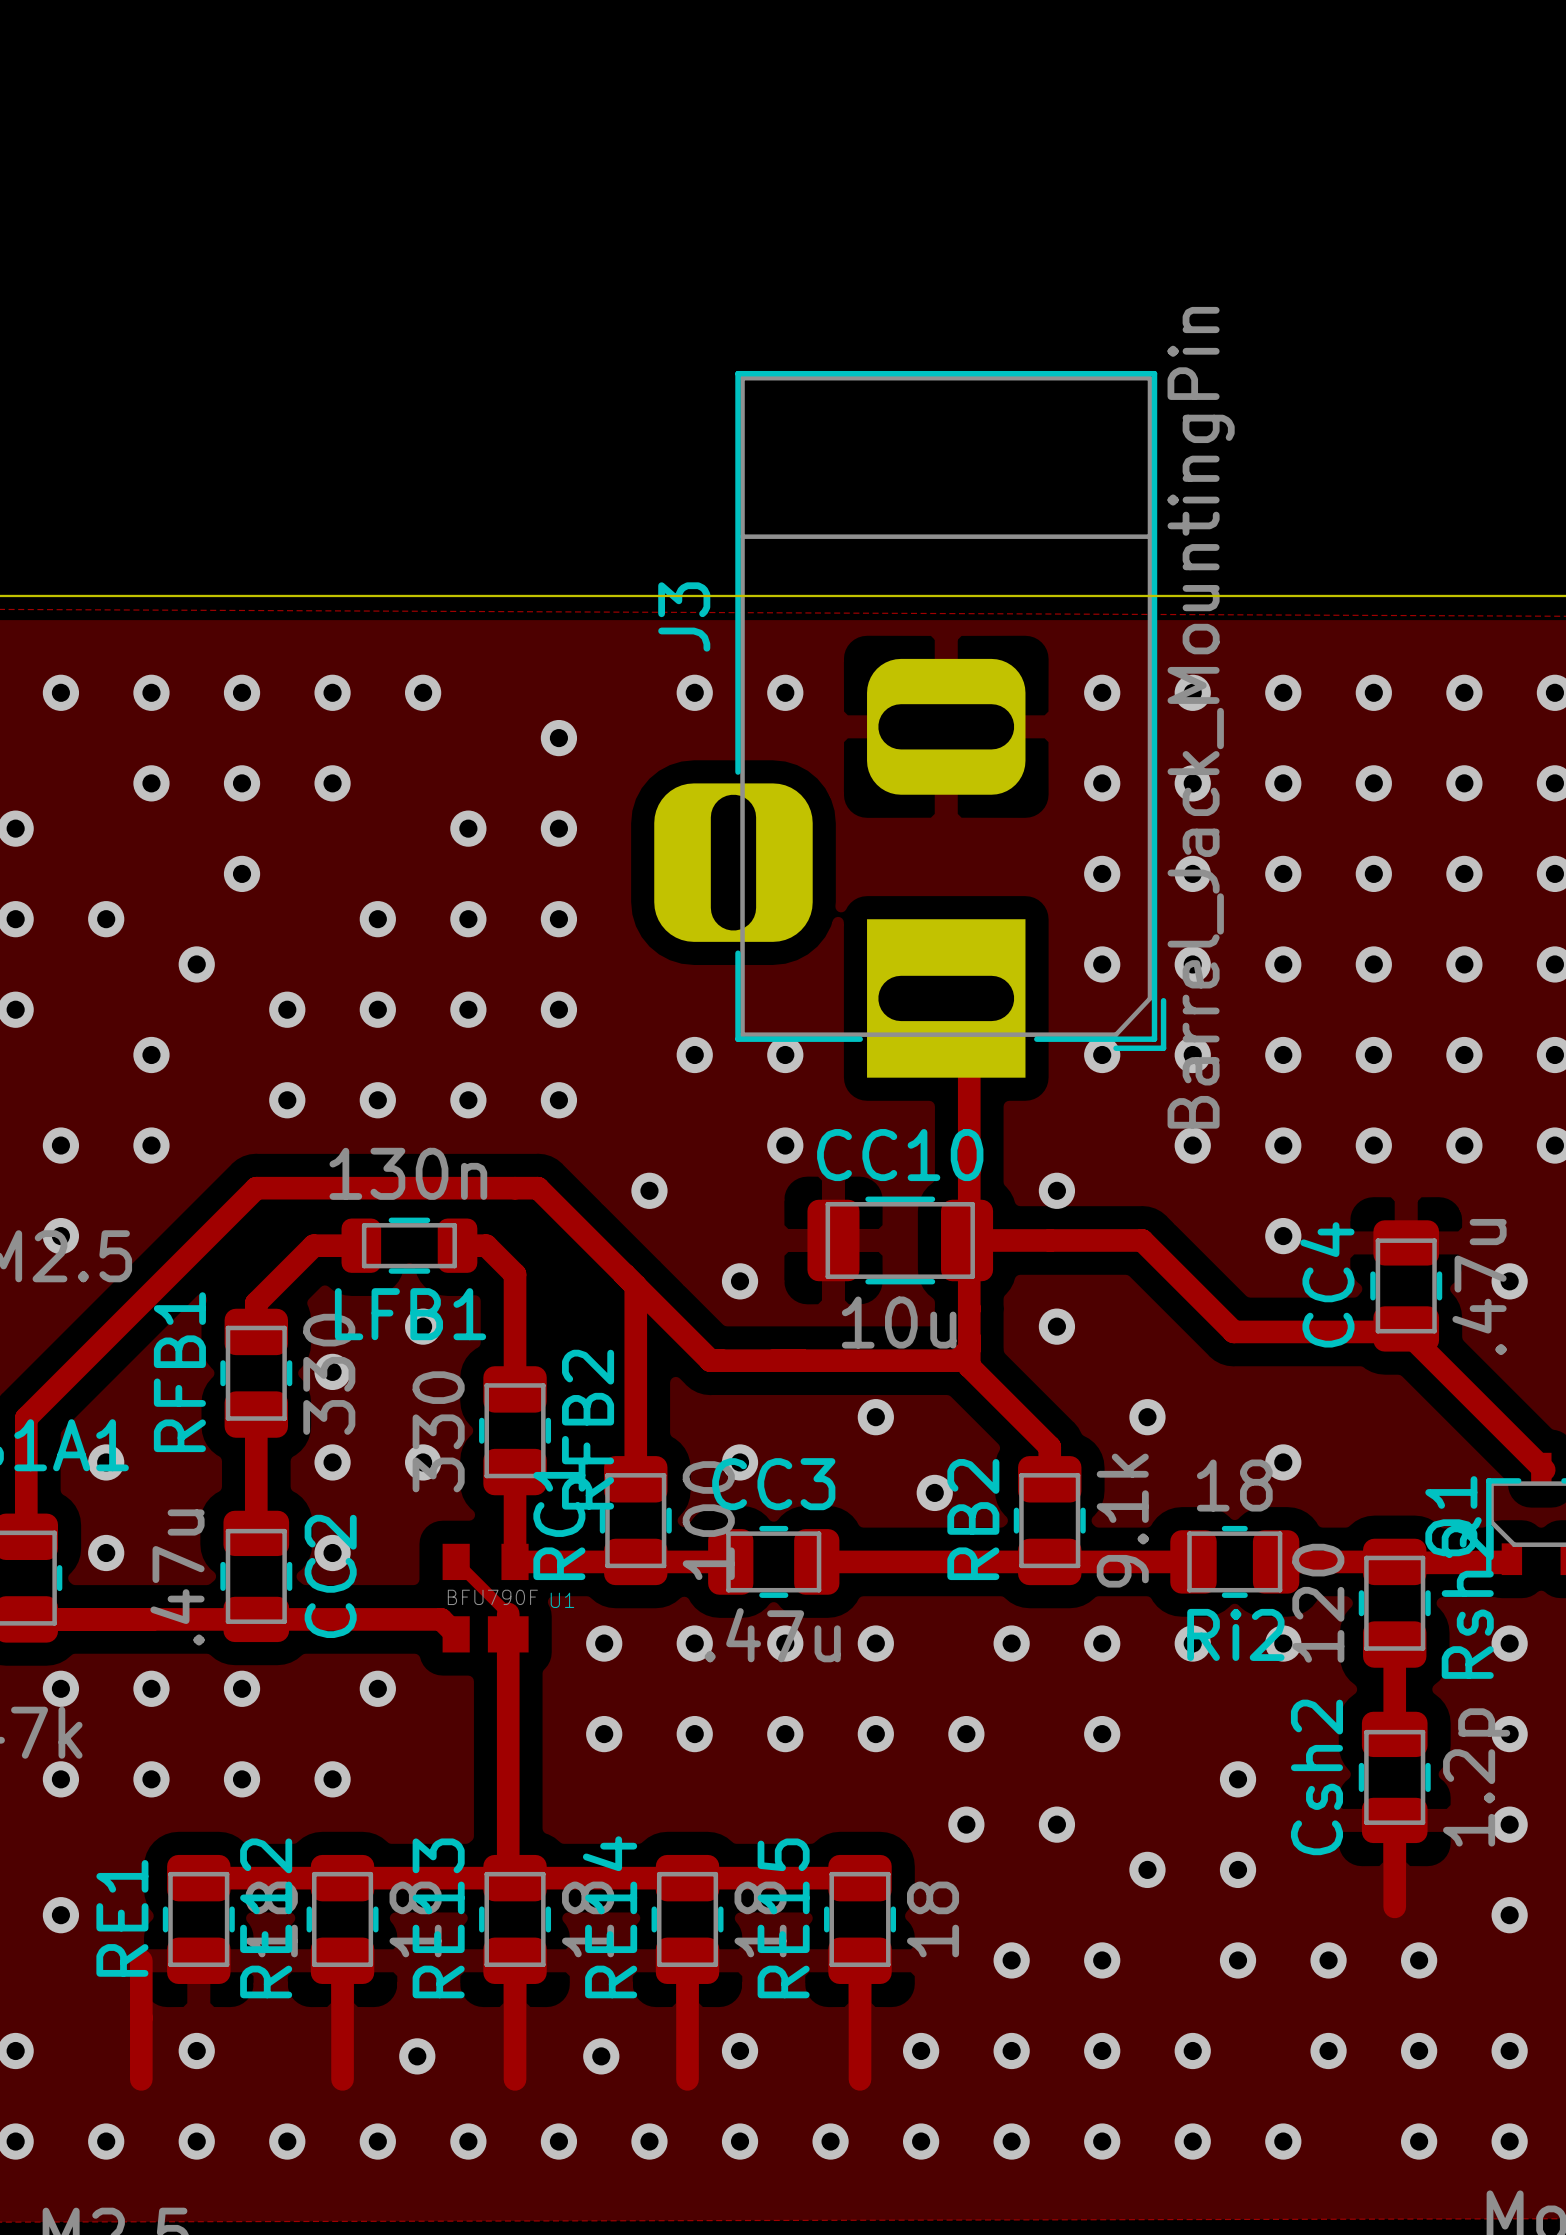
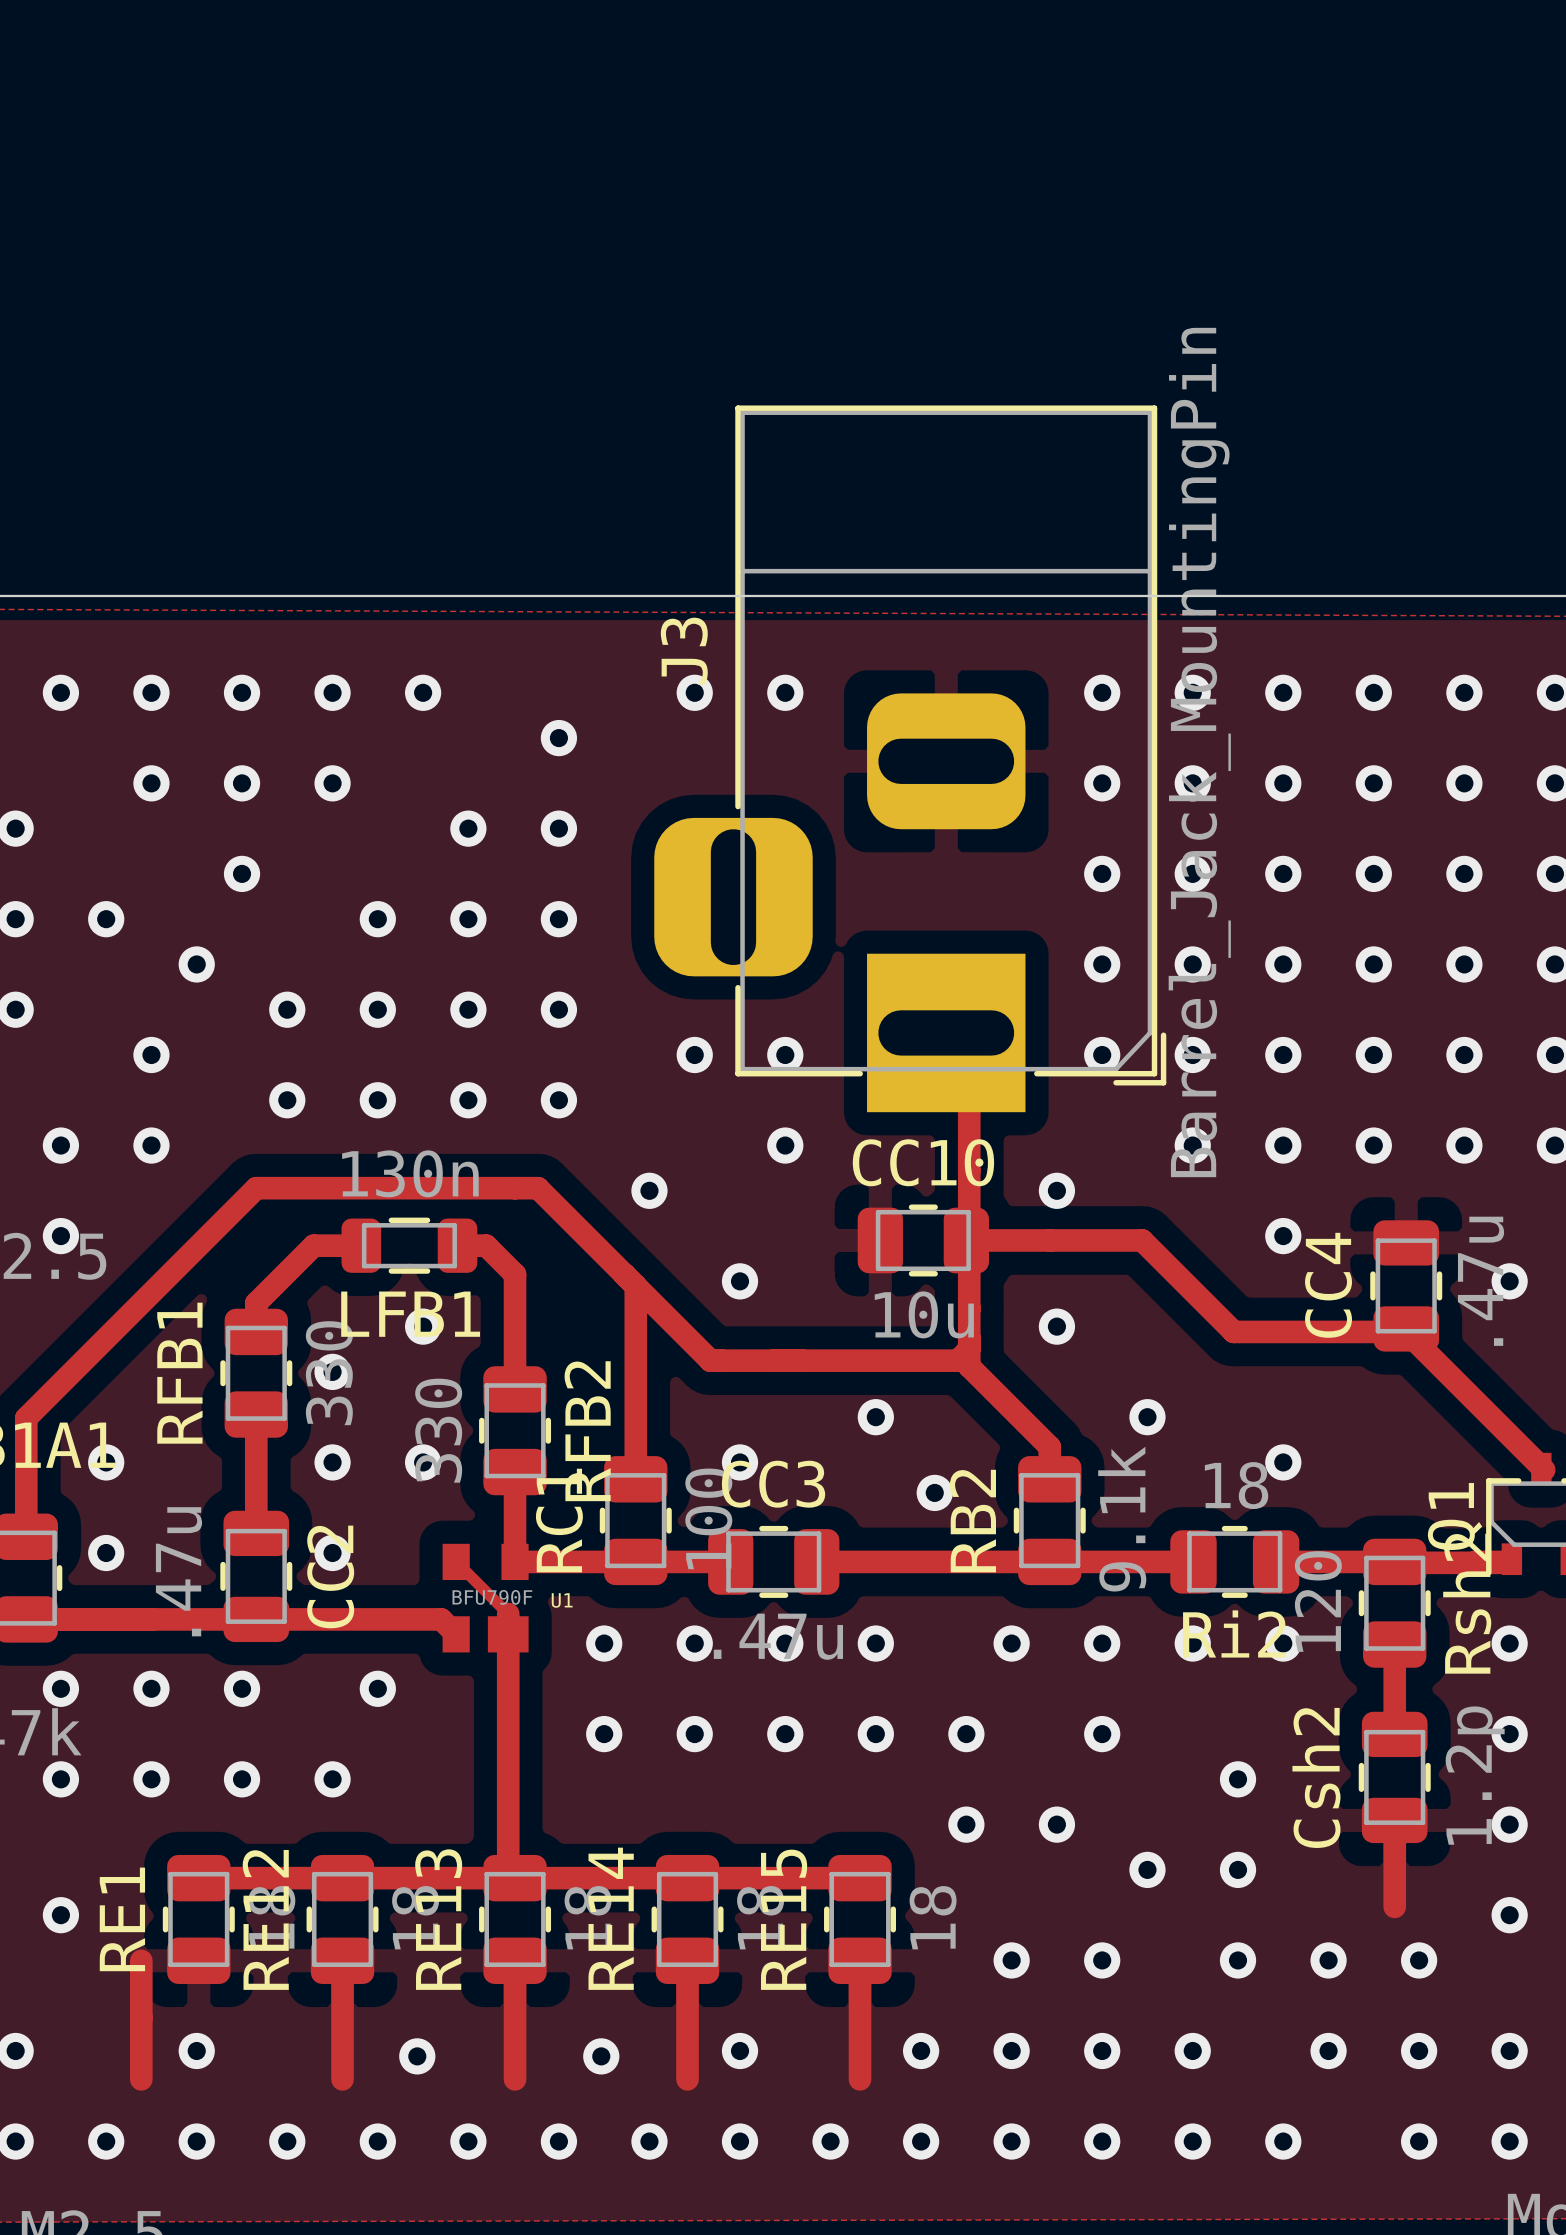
J3 position: (910, 724) -> (910, 758)
CC10 footprint: [807, 1196, 994, 1285] -> [857, 1204, 989, 1277]

